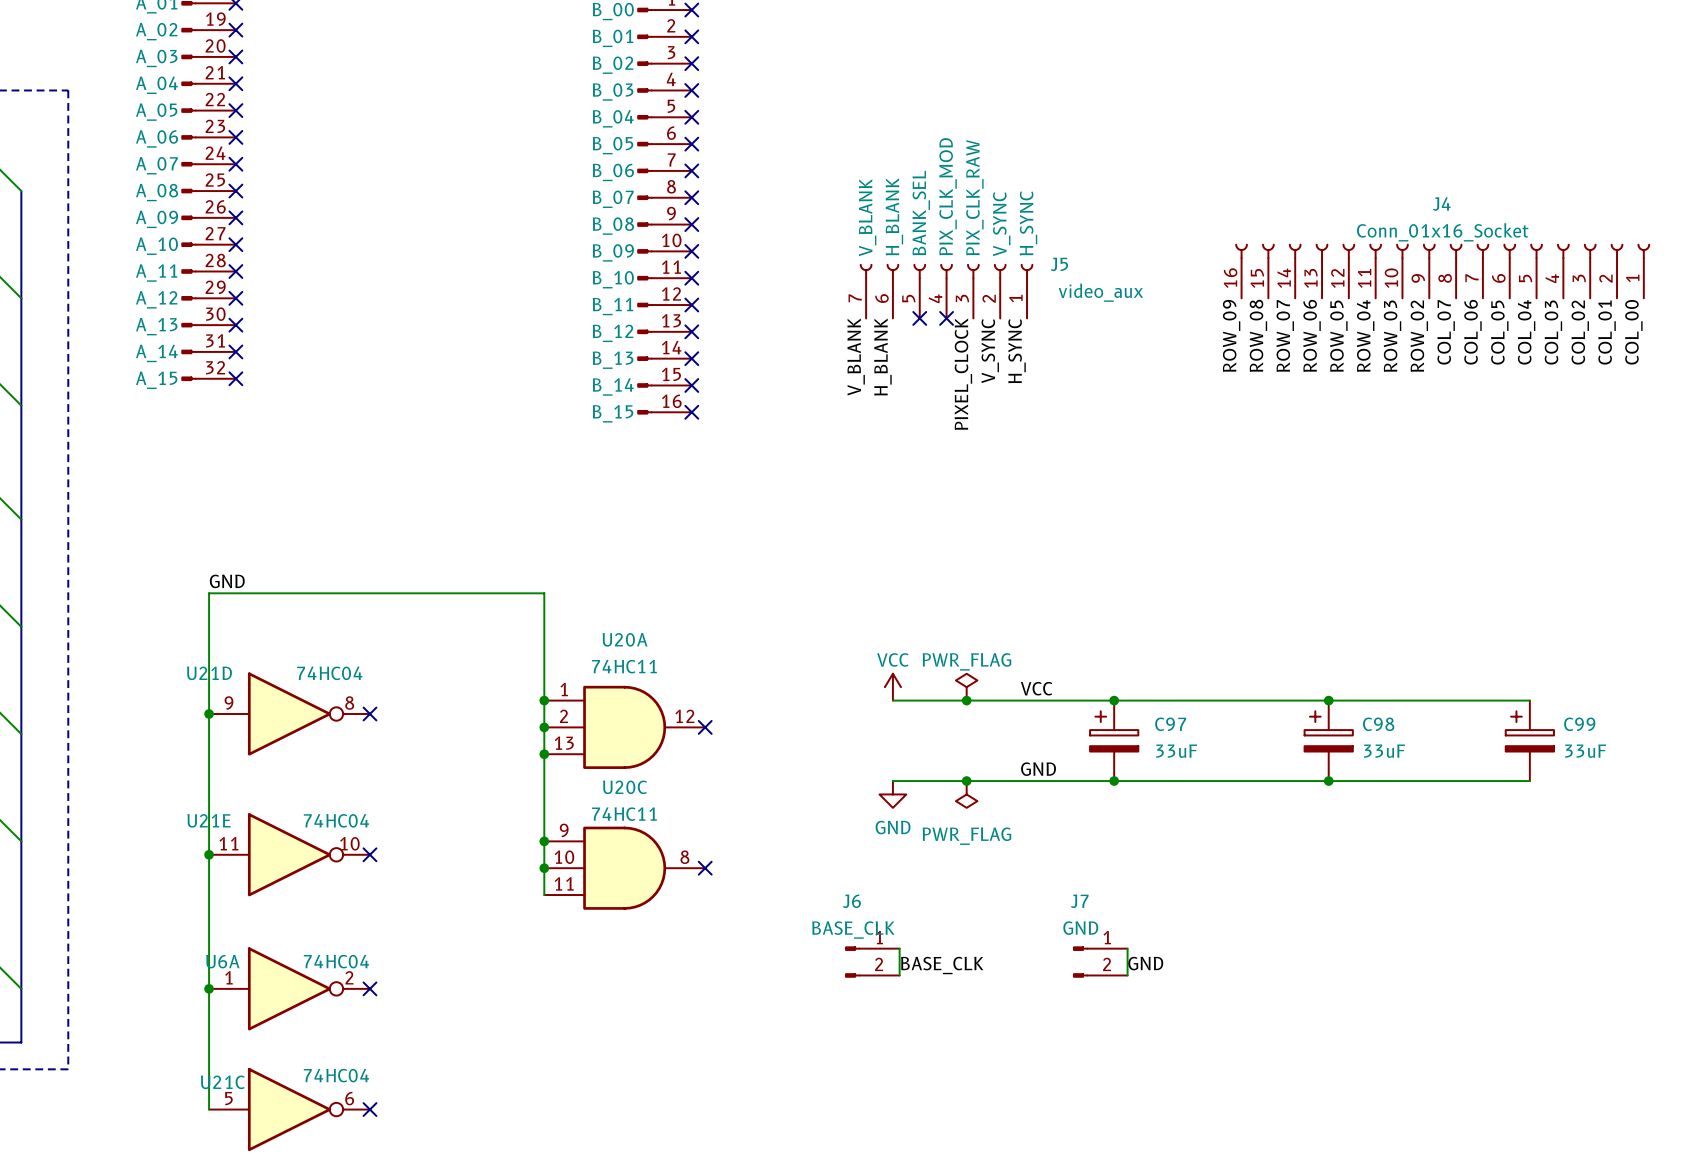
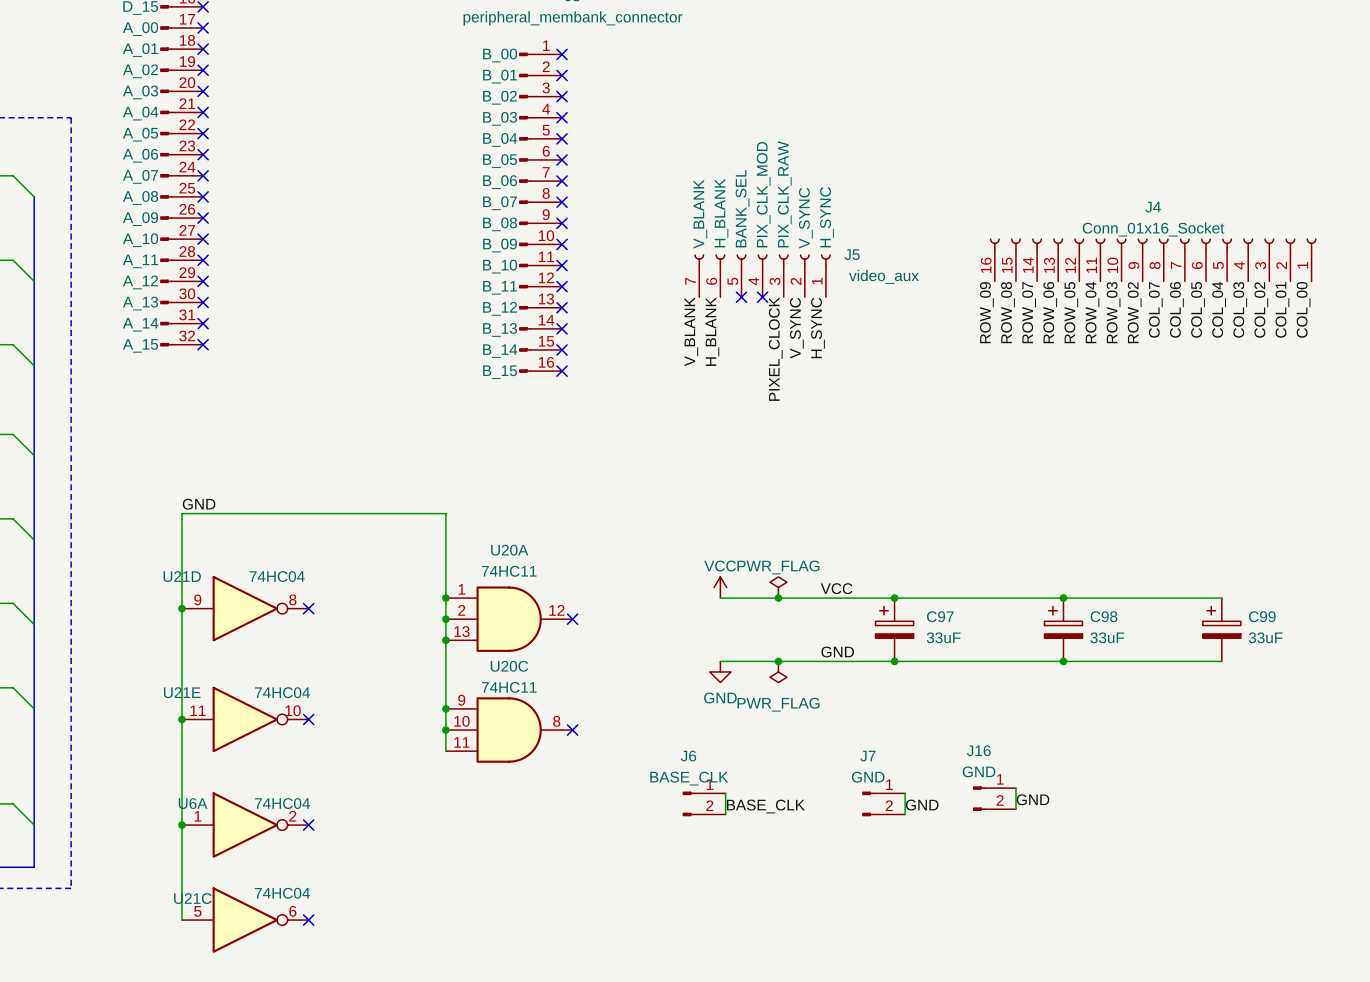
wire: none -> (1015, 788) (1015, 809)
J16: none -> GND (994, 798)
label: none -> GND (1033, 799)

